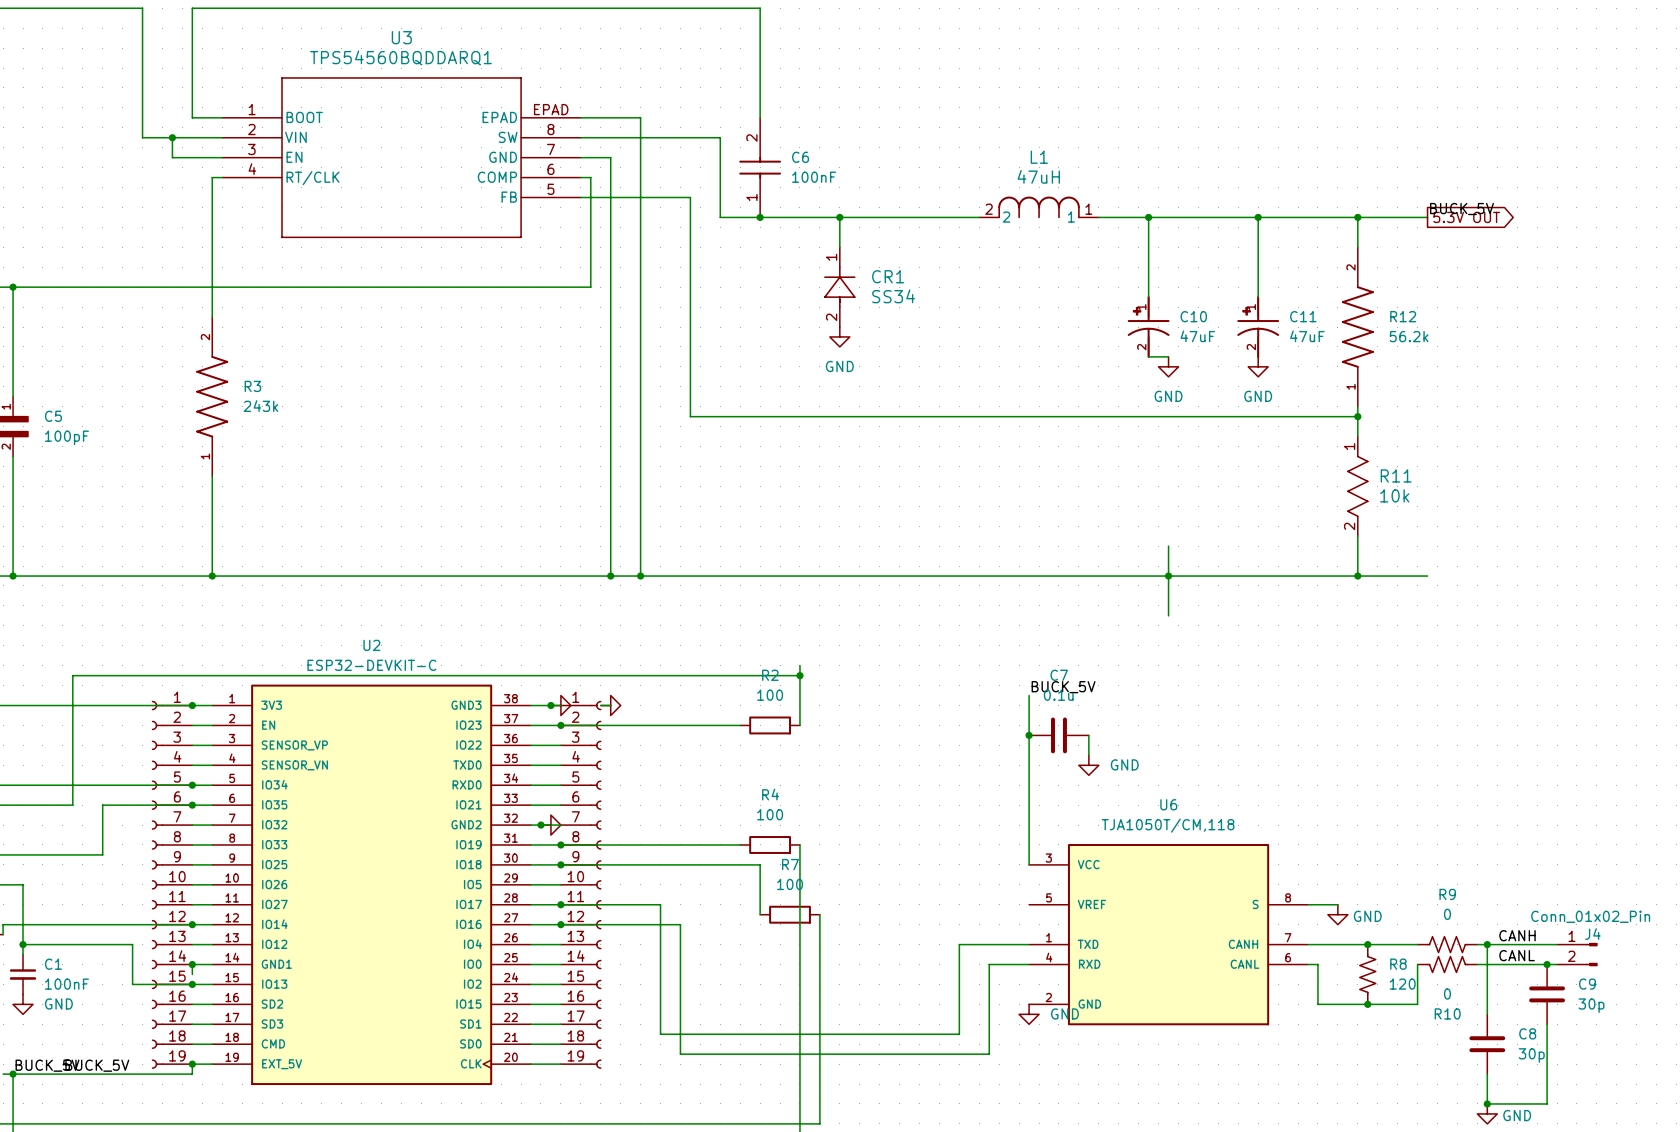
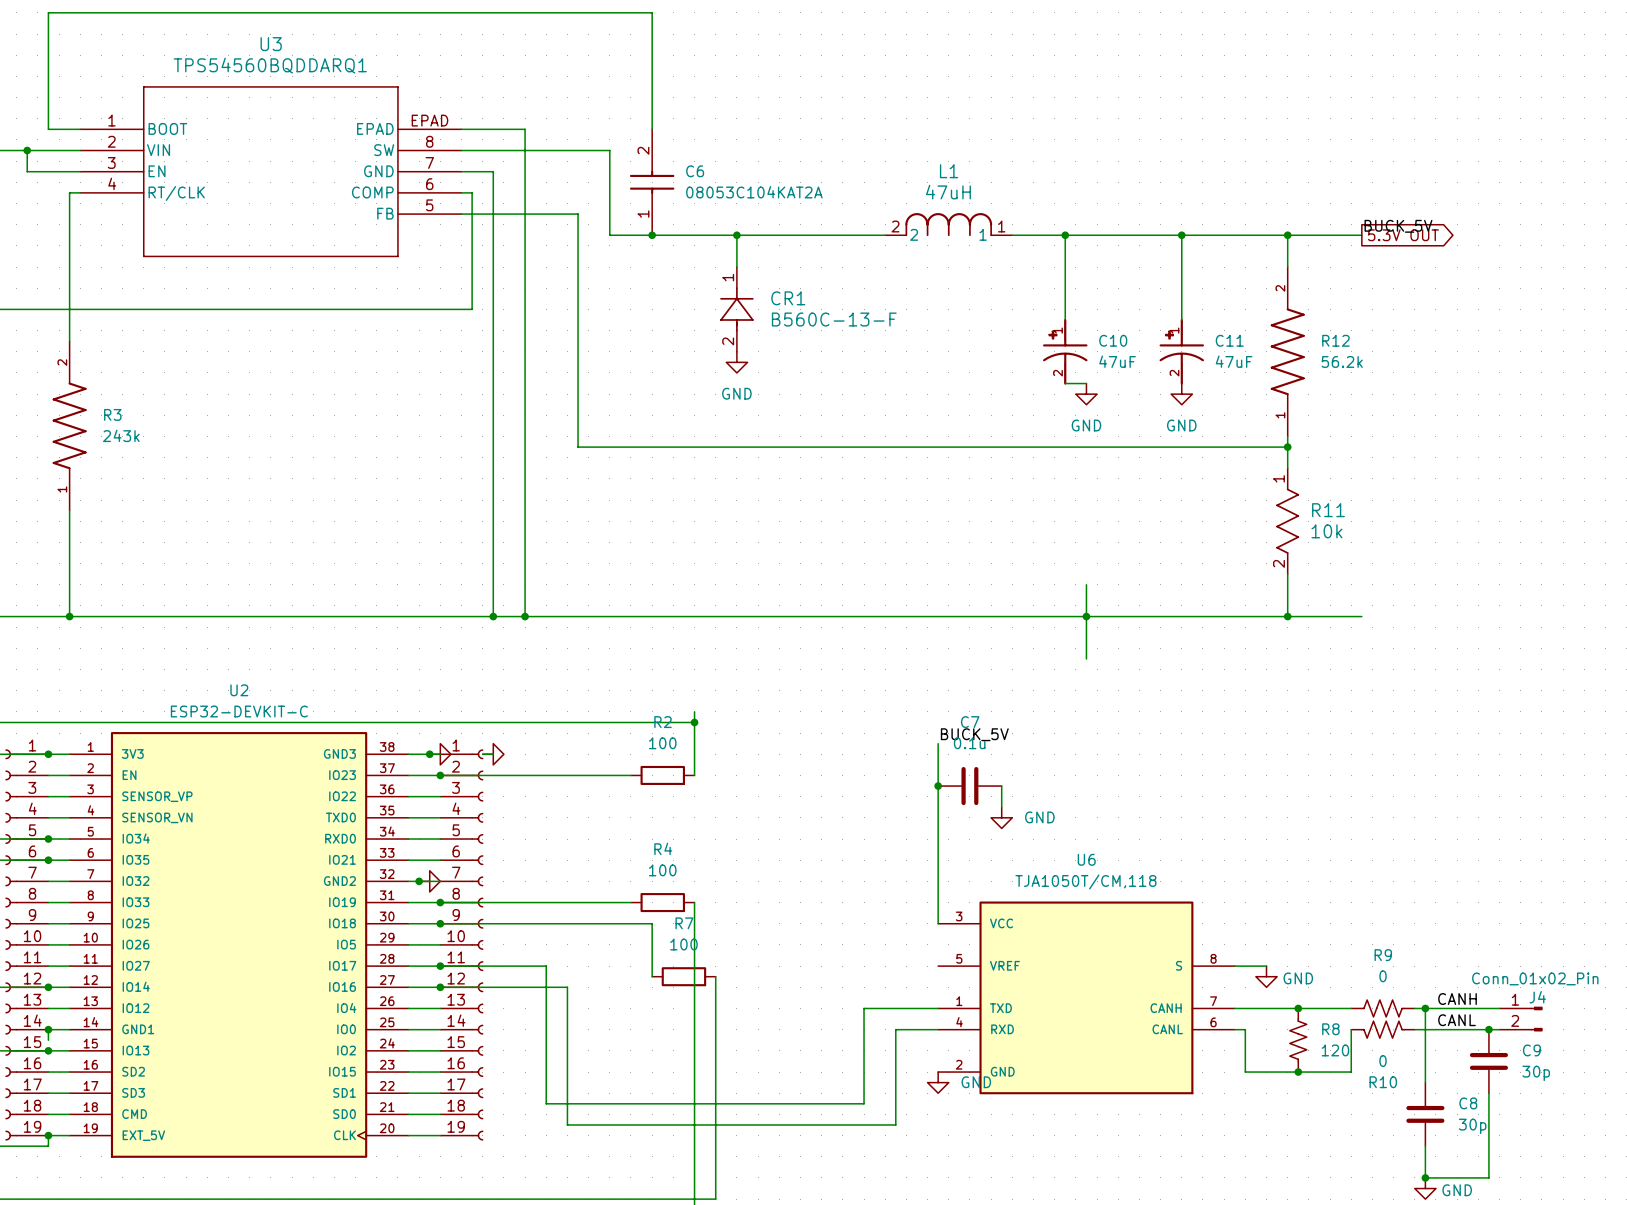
C6 value: 100nF (814, 177) -> 08053C104KAT2A (754, 192)
CR1 value: SS34 (893, 296) -> B560C-13-F (834, 319)

